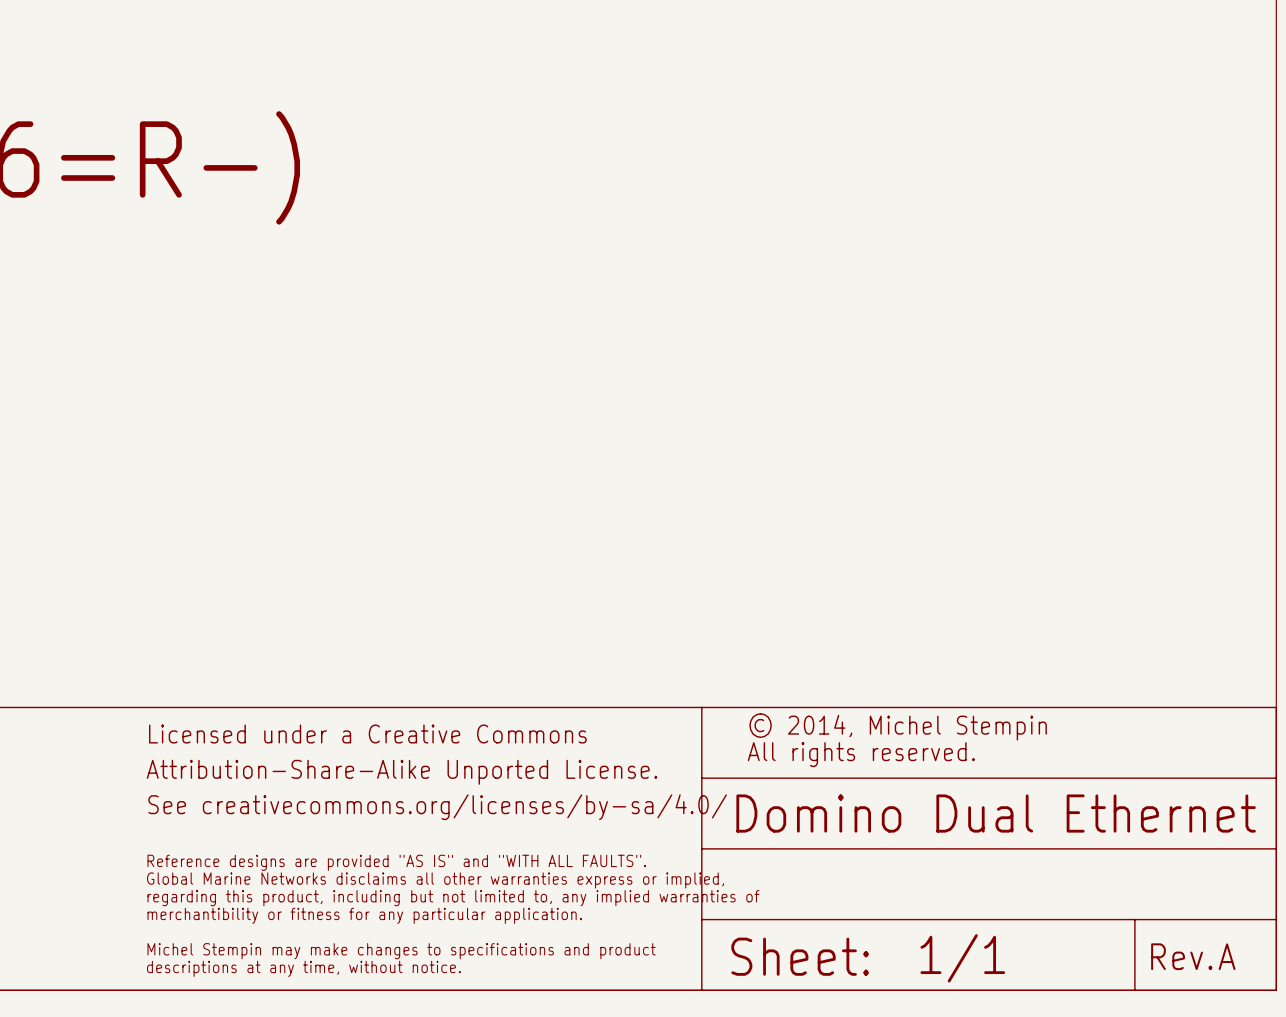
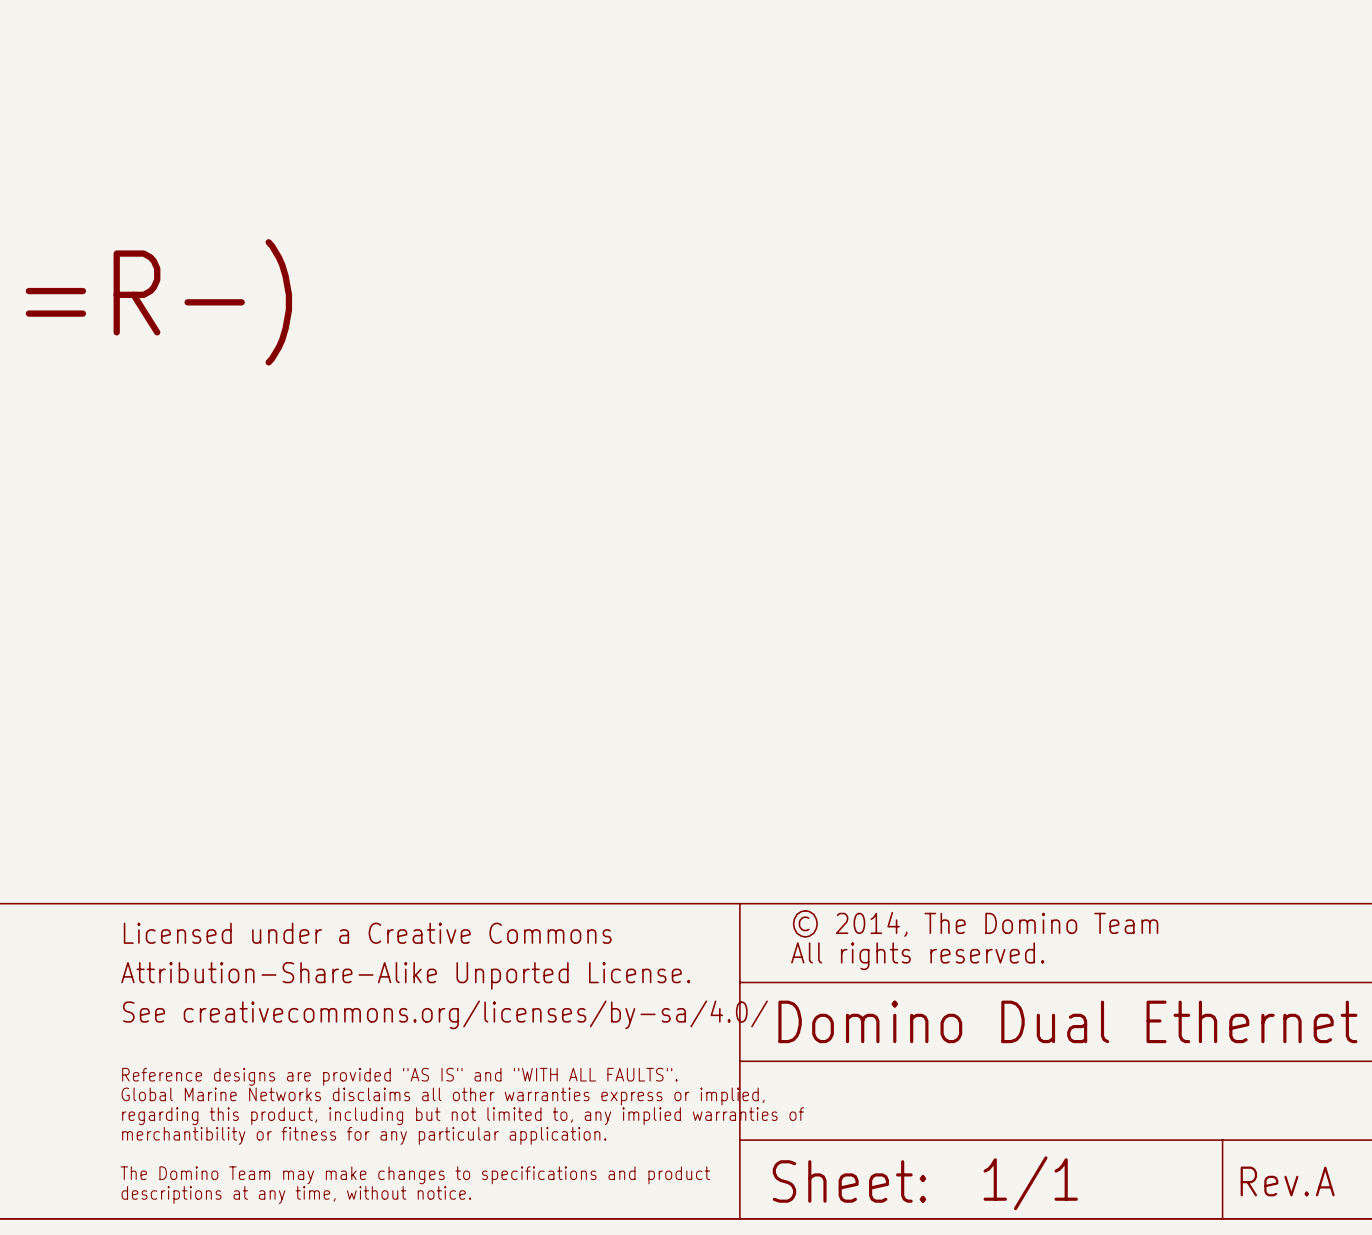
text: © 2014, Michel Stempin (898, 726) -> © 2014, The Domino Team (975, 923)
text: Michel Stempin may make changes to specifications and product (401, 951) -> The Domino Team may make changes to specifications and product (415, 1175)

